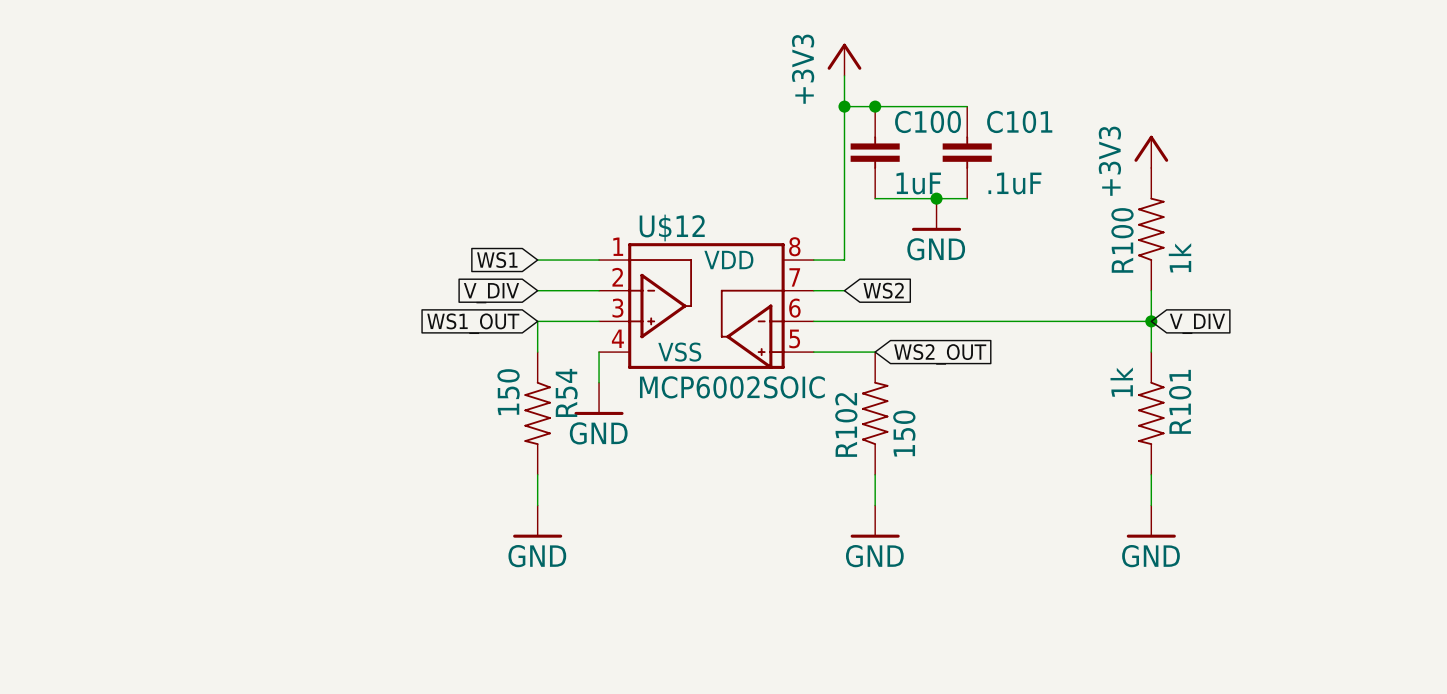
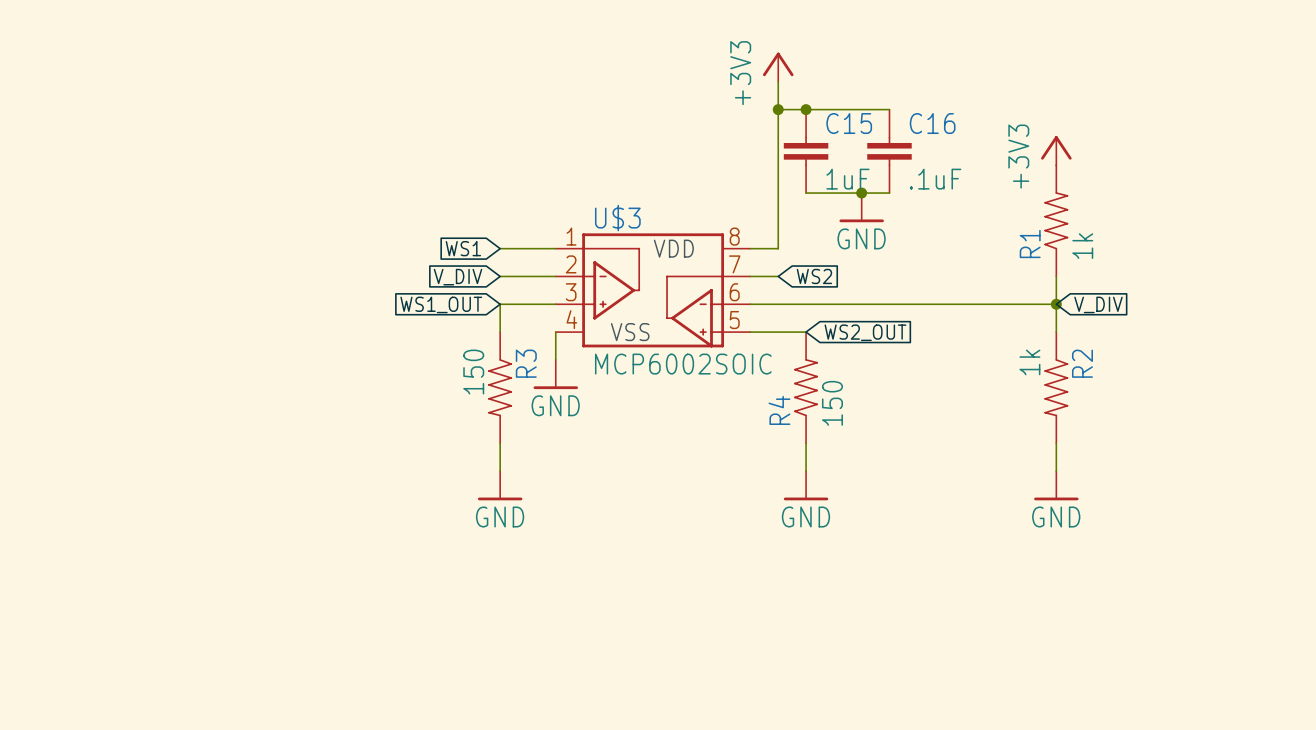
C100 name: C100 (928, 121) -> C15 (849, 123)
C101 name: C101 (1019, 121) -> C16 (932, 123)
U$12 name: U$12 (672, 227) -> U$3 (617, 218)
R100 name: R100 (1122, 240) -> R1 (1030, 244)
R54 name: R54 (566, 392) -> R3 (526, 363)
R101 name: R101 (1180, 401) -> R2 (1082, 363)
R102 name: R102 (846, 424) -> R4 (779, 410)

